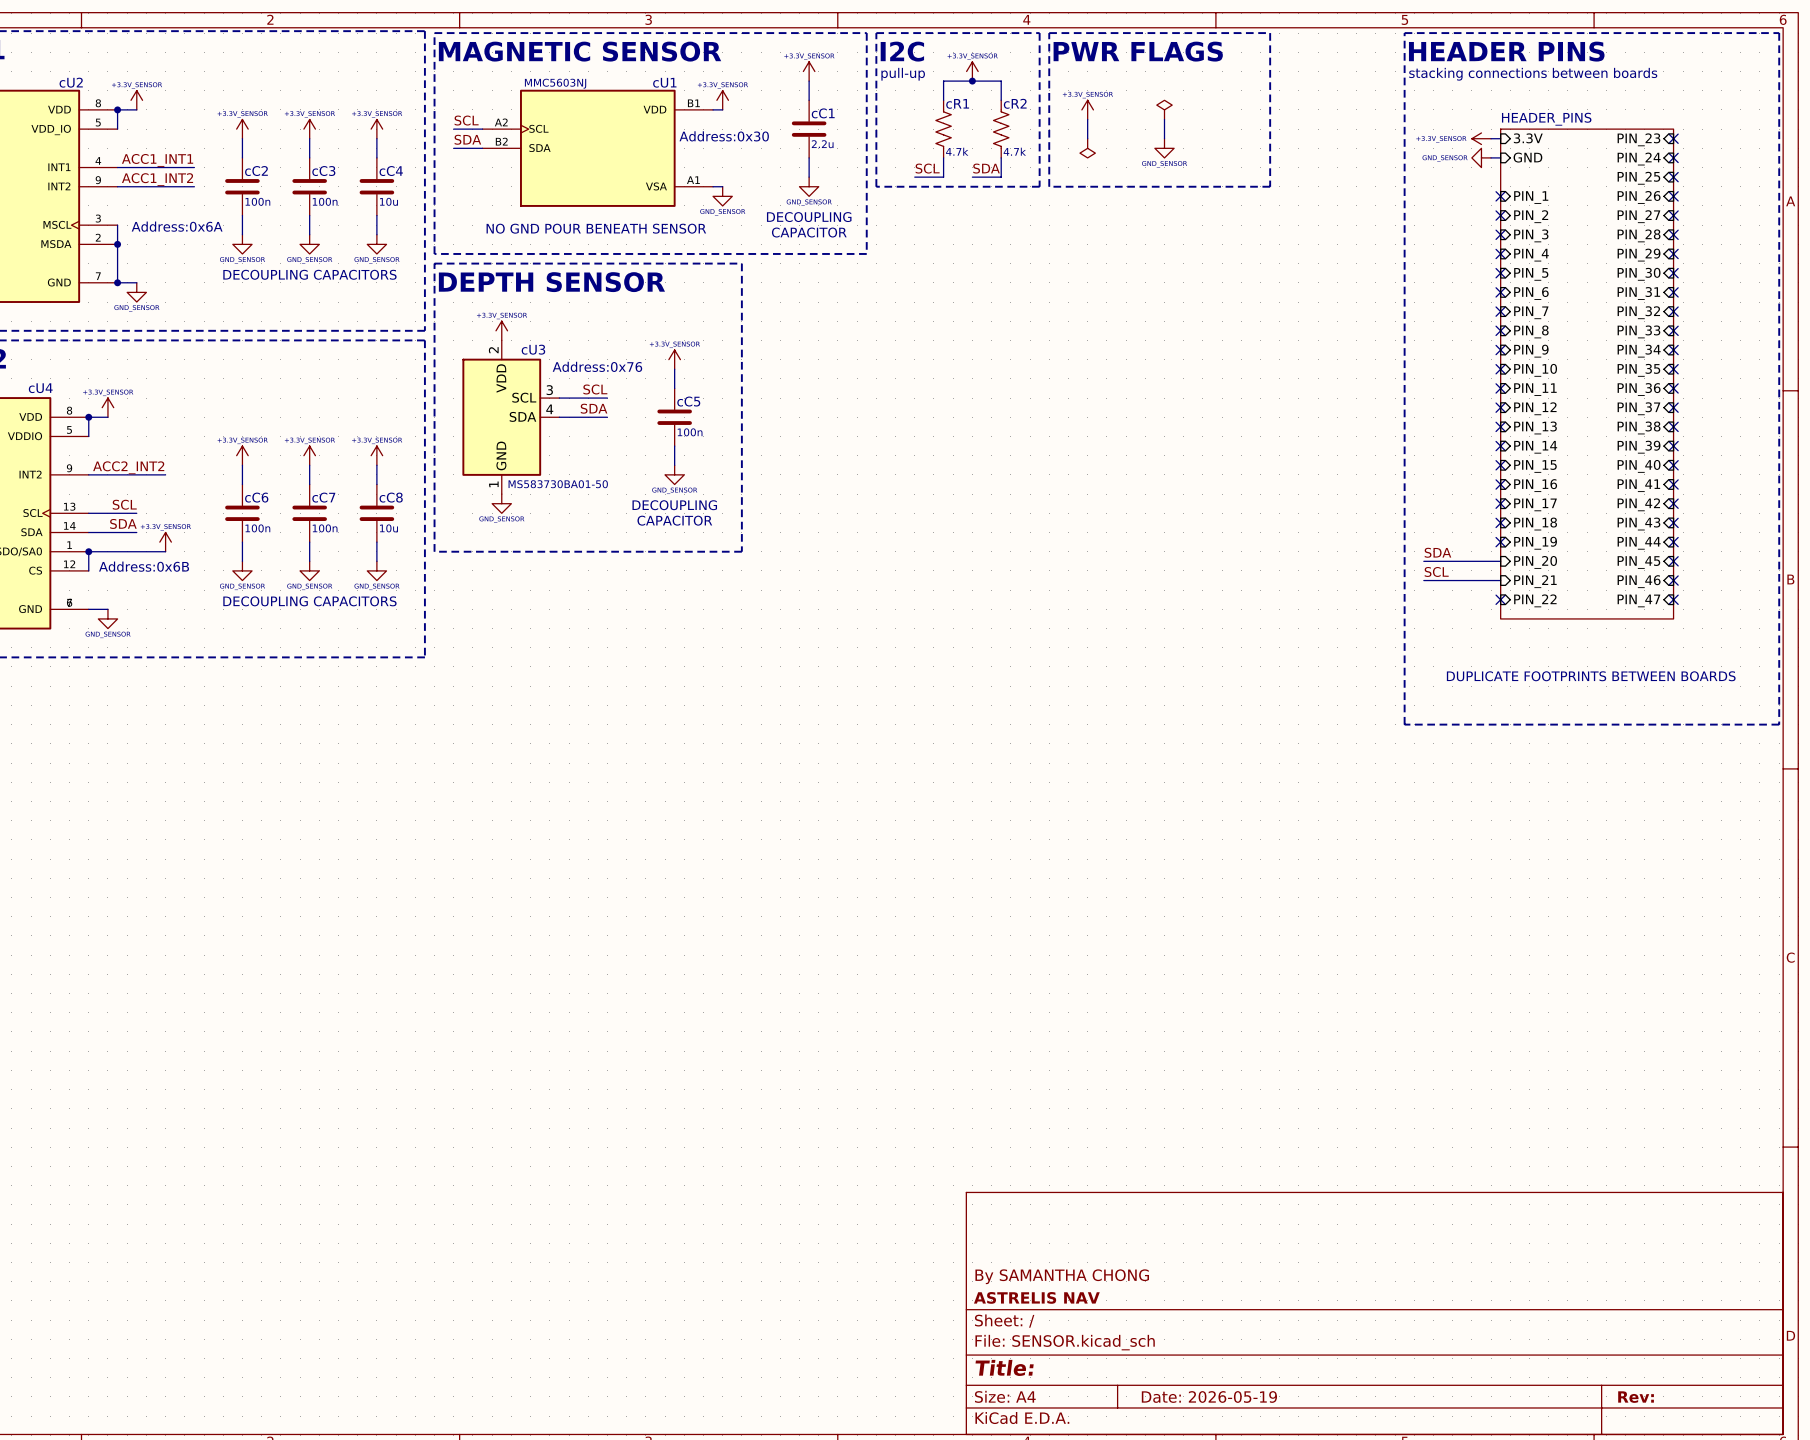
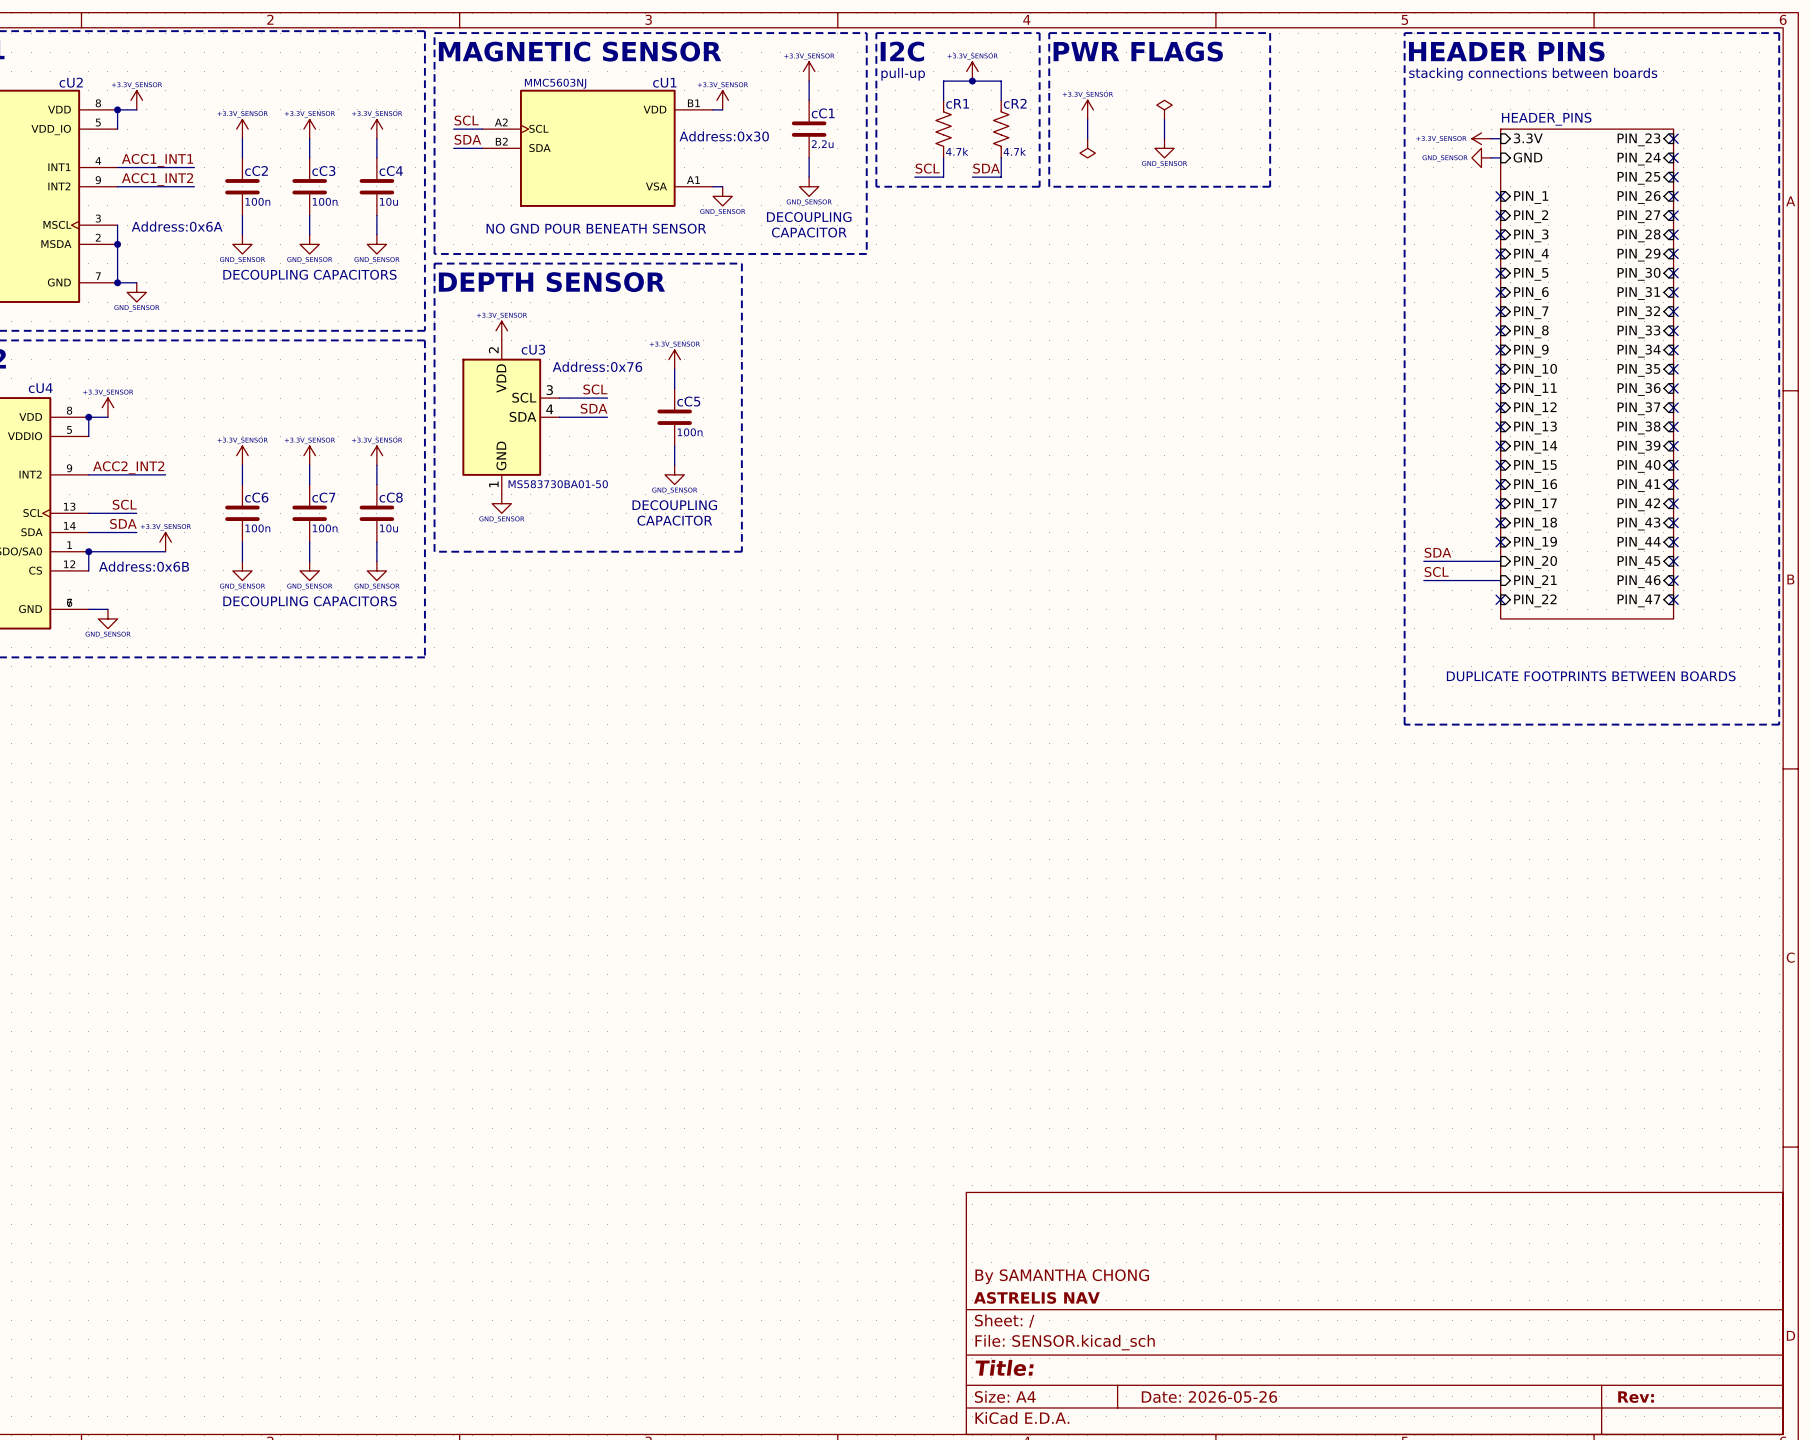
title block: Date: 2026-05-19 (1209, 1396) -> Date: 2026-05-26 (1209, 1396)

